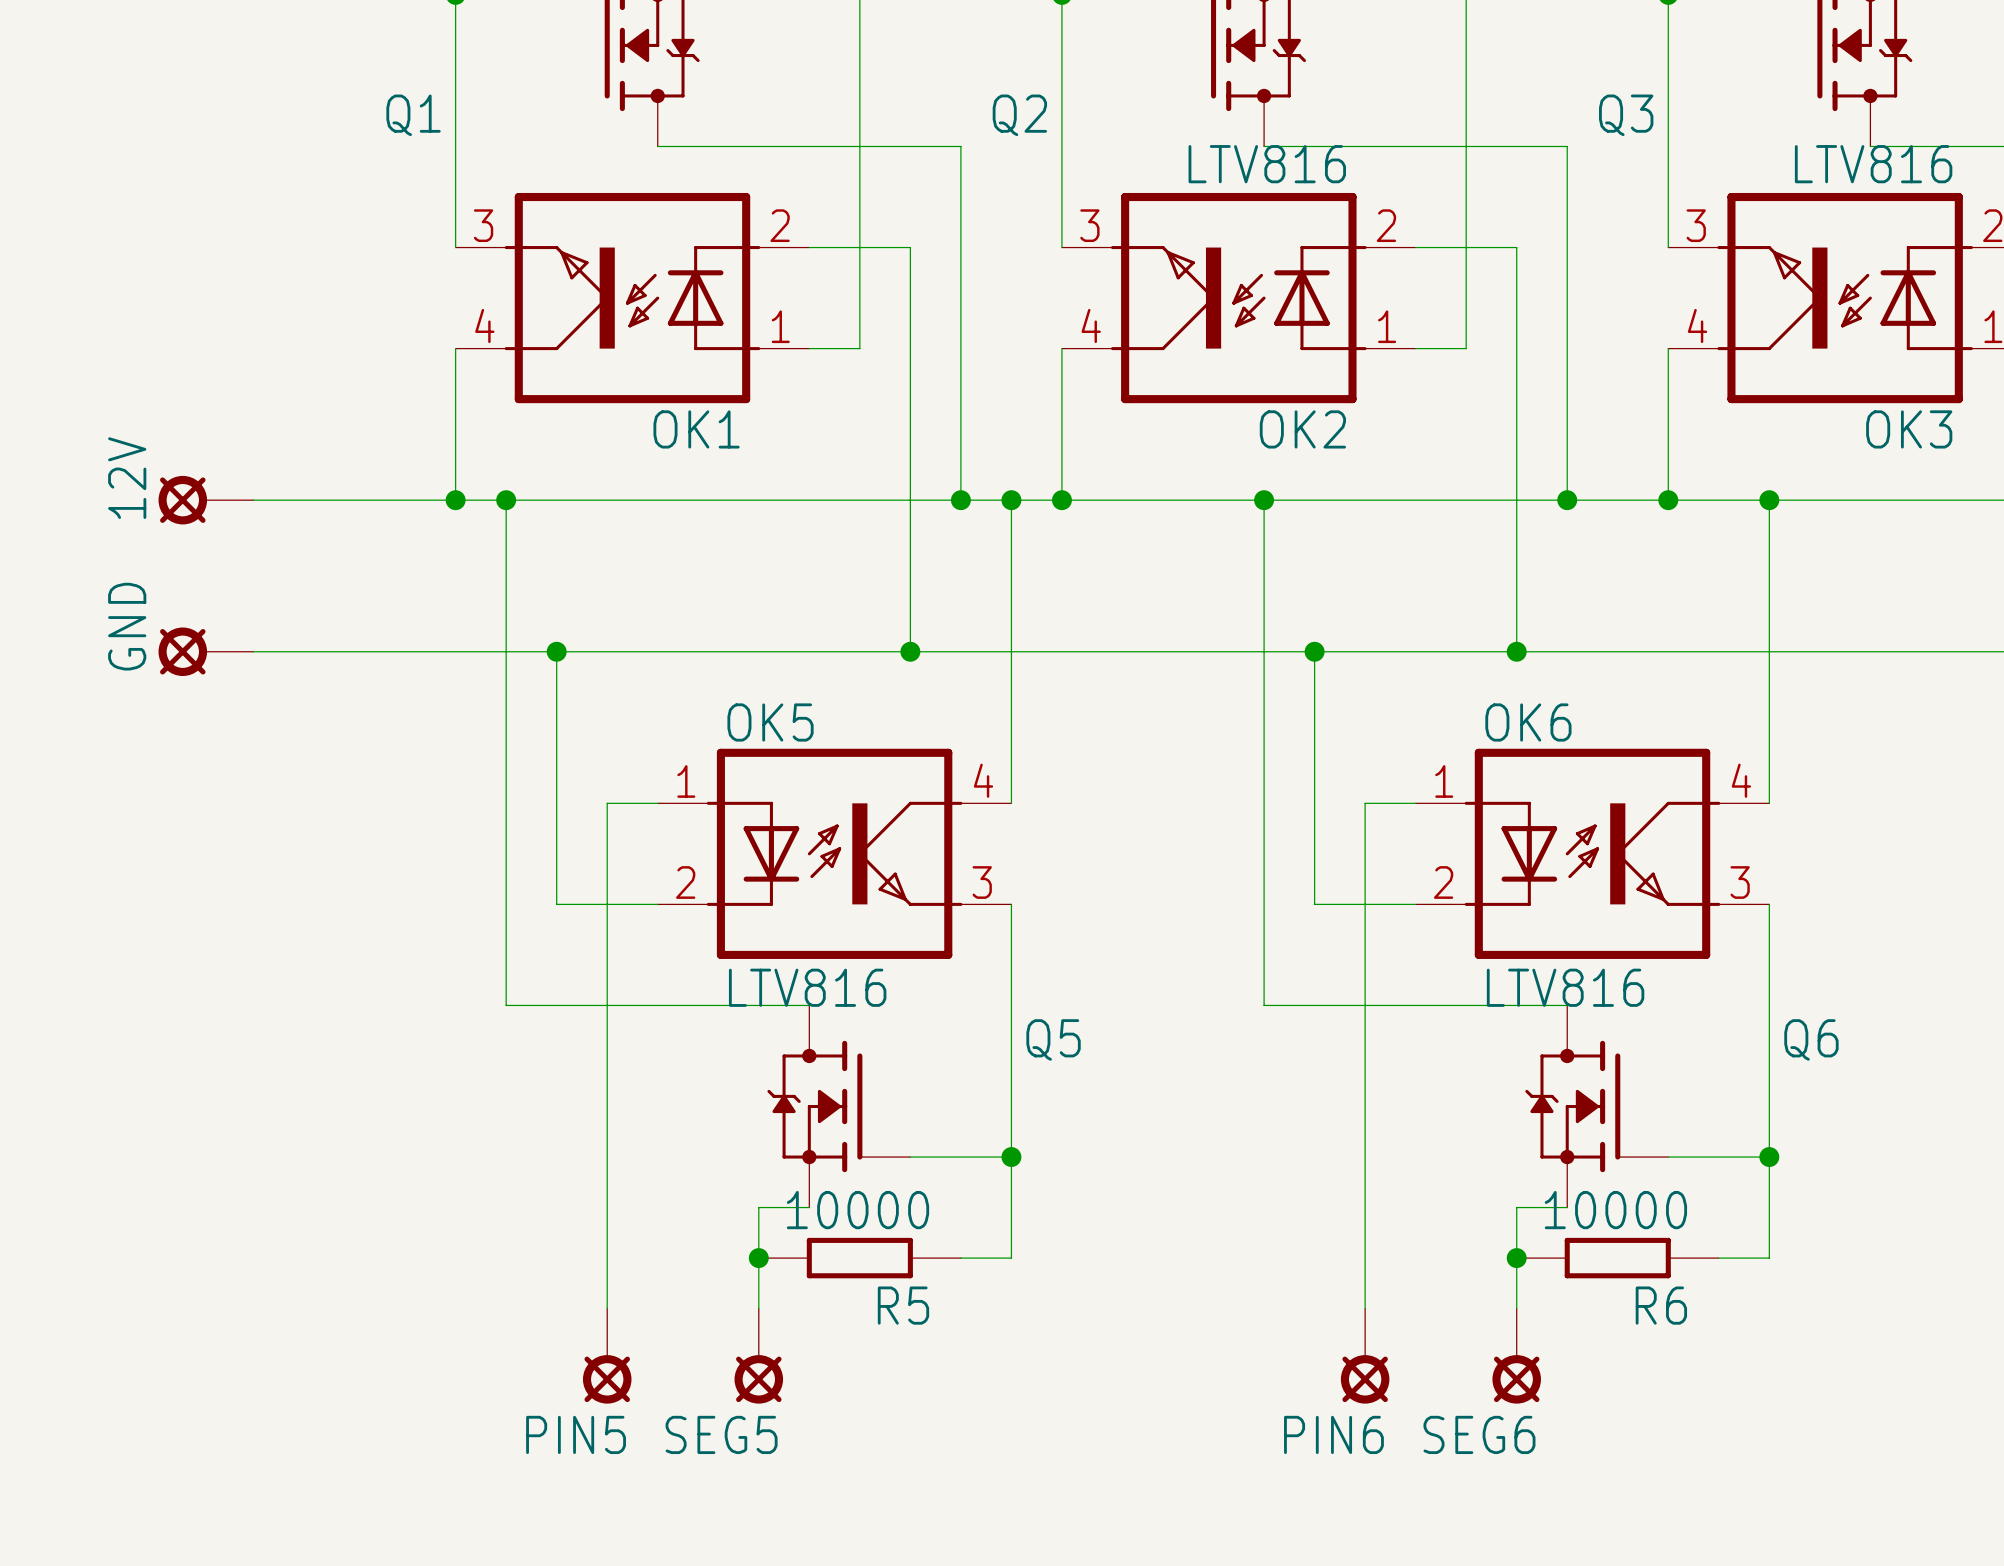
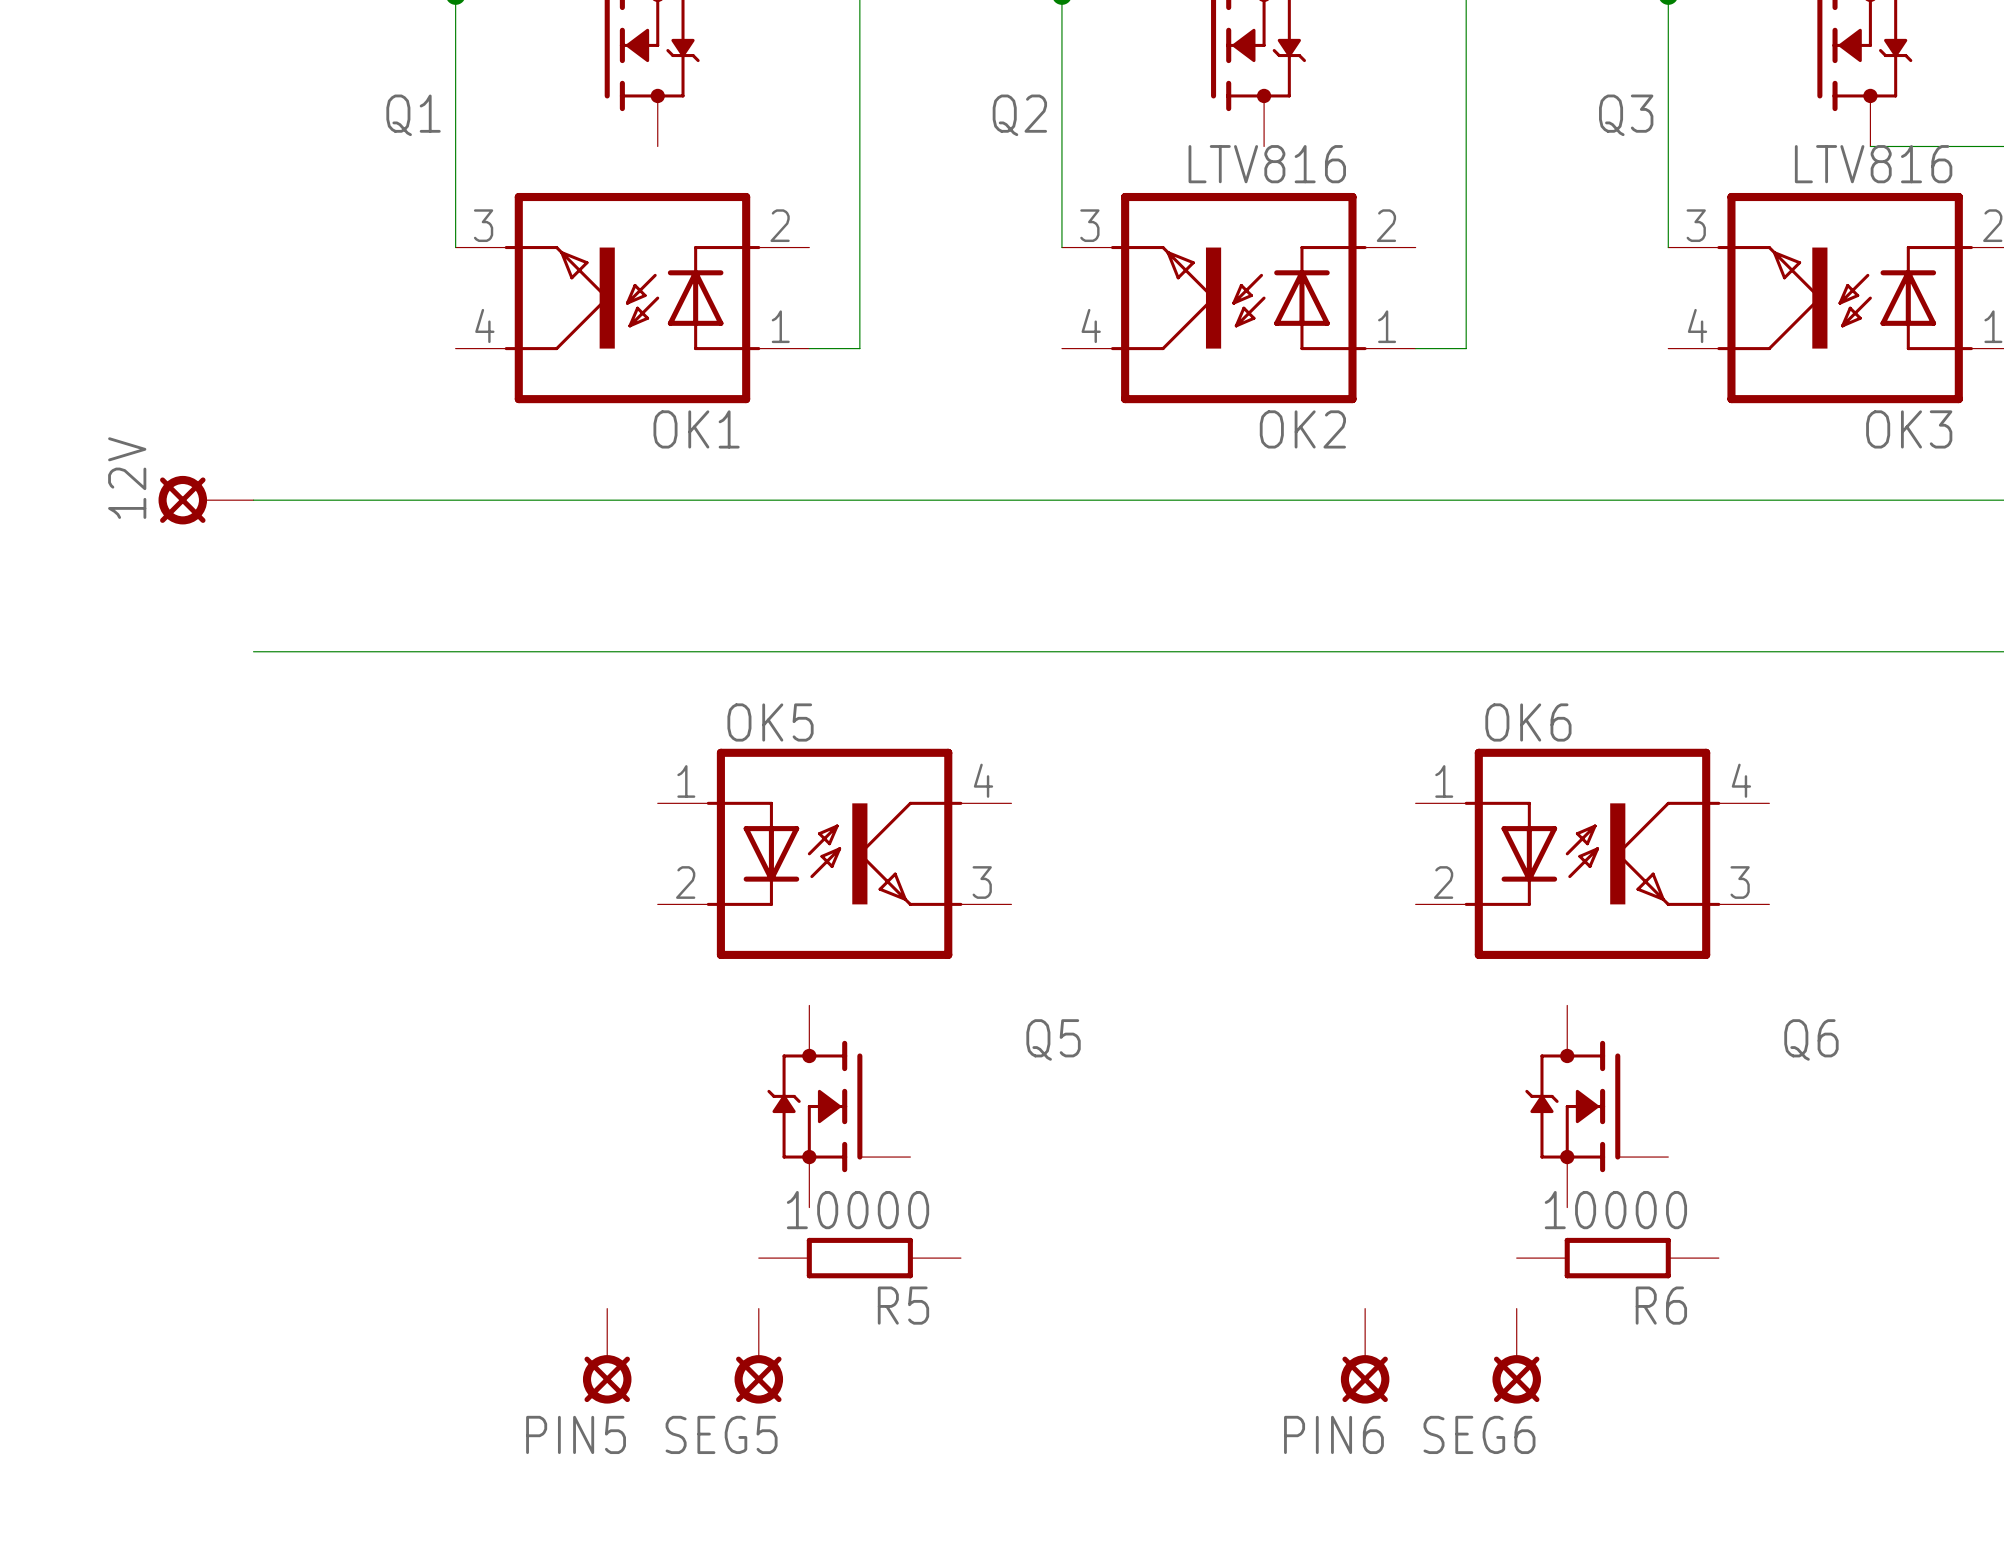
wire: (657, 146) (960, 146) (960, 500) -> none
wire: (1264, 146) (1567, 146) (1567, 500) -> none
wire: (809, 247) (910, 247) (910, 651) -> none
wire: (1415, 247) (1516, 247) (1516, 651) -> none
wire: (455, 348) (455, 500) -> none
wire: (1061, 348) (1061, 500) -> none
wire: (1668, 348) (1668, 500) -> none
junction: (455, 500) -> none
wire: (506, 500) (506, 1005) (809, 1005) -> none
junction: (506, 500) -> none
junction: (960, 500) -> none
wire: (1011, 500) (1011, 803) -> none
junction: (1011, 500) -> none
junction: (1061, 500) -> none
wire: (1264, 500) (1264, 1005) (1567, 1005) -> none
junction: (1264, 500) -> none
junction: (1567, 500) -> none
junction: (1668, 500) -> none
wire: (1769, 500) (1769, 803) -> none
junction: (1769, 500) -> none
GND: (206, 651) -> none
wire: (556, 651) (556, 904) (657, 904) -> none
junction: (556, 651) -> none
junction: (910, 651) -> none
wire: (1314, 651) (1314, 904) (1415, 904) -> none
junction: (1314, 651) -> none
junction: (1516, 651) -> none
wire: (657, 803) (607, 803) (607, 1308) -> none
wire: (1415, 803) (1365, 803) (1365, 1308) -> none
wire: (1011, 904) (1011, 1258) (960, 1258) -> none
wire: (1769, 904) (1769, 1258) (1718, 1258) -> none
OK5 value: LTV816 (807, 987) -> none
OK6 value: LTV816 (1565, 987) -> none
wire: (910, 1157) (1011, 1157) -> none
junction: (1011, 1157) -> none
wire: (1668, 1157) (1769, 1157) -> none
junction: (1769, 1157) -> none
wire: (809, 1207) (758, 1207) (758, 1308) -> none
wire: (1567, 1207) (1516, 1207) (1516, 1308) -> none
junction: (758, 1258) -> none
junction: (1516, 1258) -> none

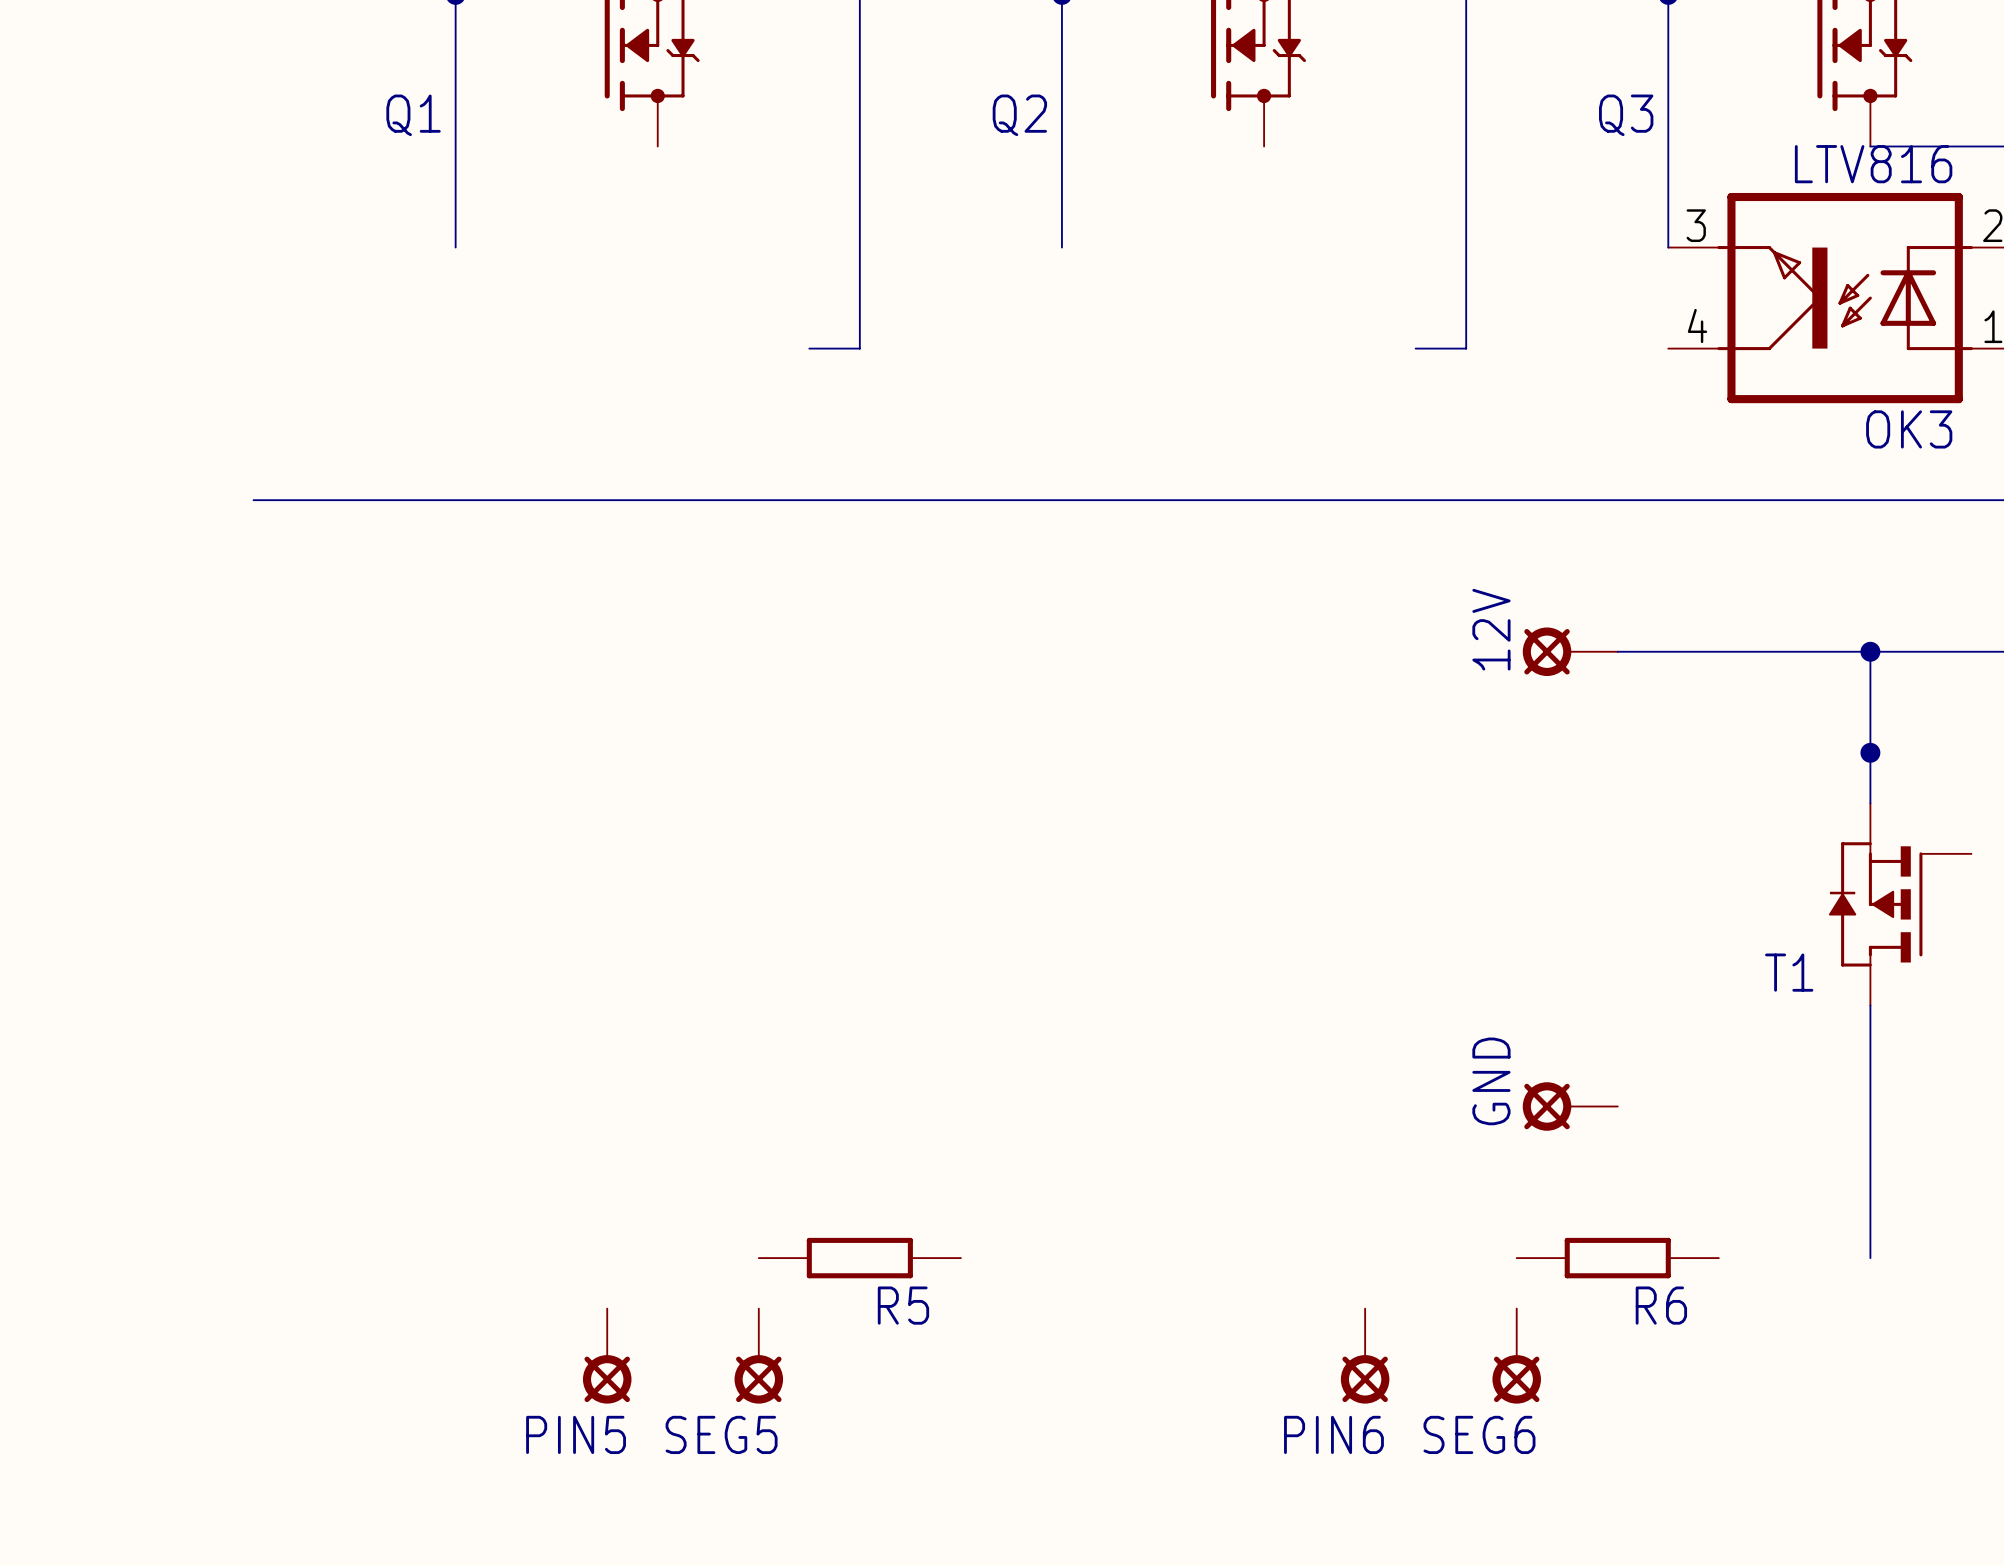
OK1: (632, 298) -> none
OK2: LTV816 (1238, 298) -> none
12V position: (206, 500) -> (1570, 651)
wire: (253, 651) (1617, 651) -> none
wire: none -> (1870, 651) (1870, 803)
junction: none -> (1870, 651)
junction: none -> (1870, 752)
OK5: (834, 853) -> none
OK6: (1592, 853) -> none
T1: none -> (1900, 904)
wire: none -> (1870, 1005) (1870, 1258)
Q5: (838, 1106) -> none
GND: none -> (1570, 1106)
Q6: (1596, 1106) -> none
R5 value: 10000 (857, 1210) -> none
R6 value: 10000 (1615, 1210) -> none

